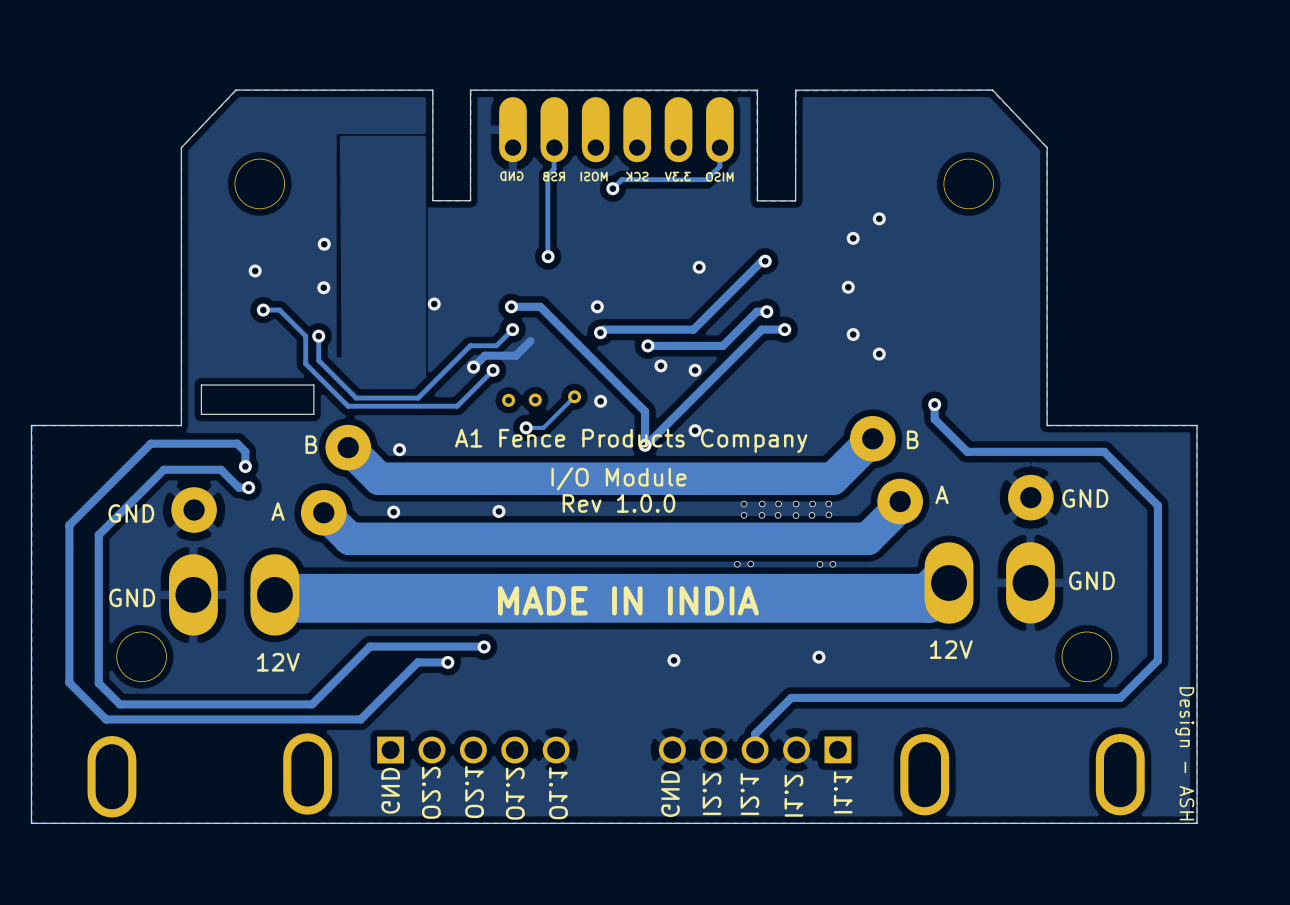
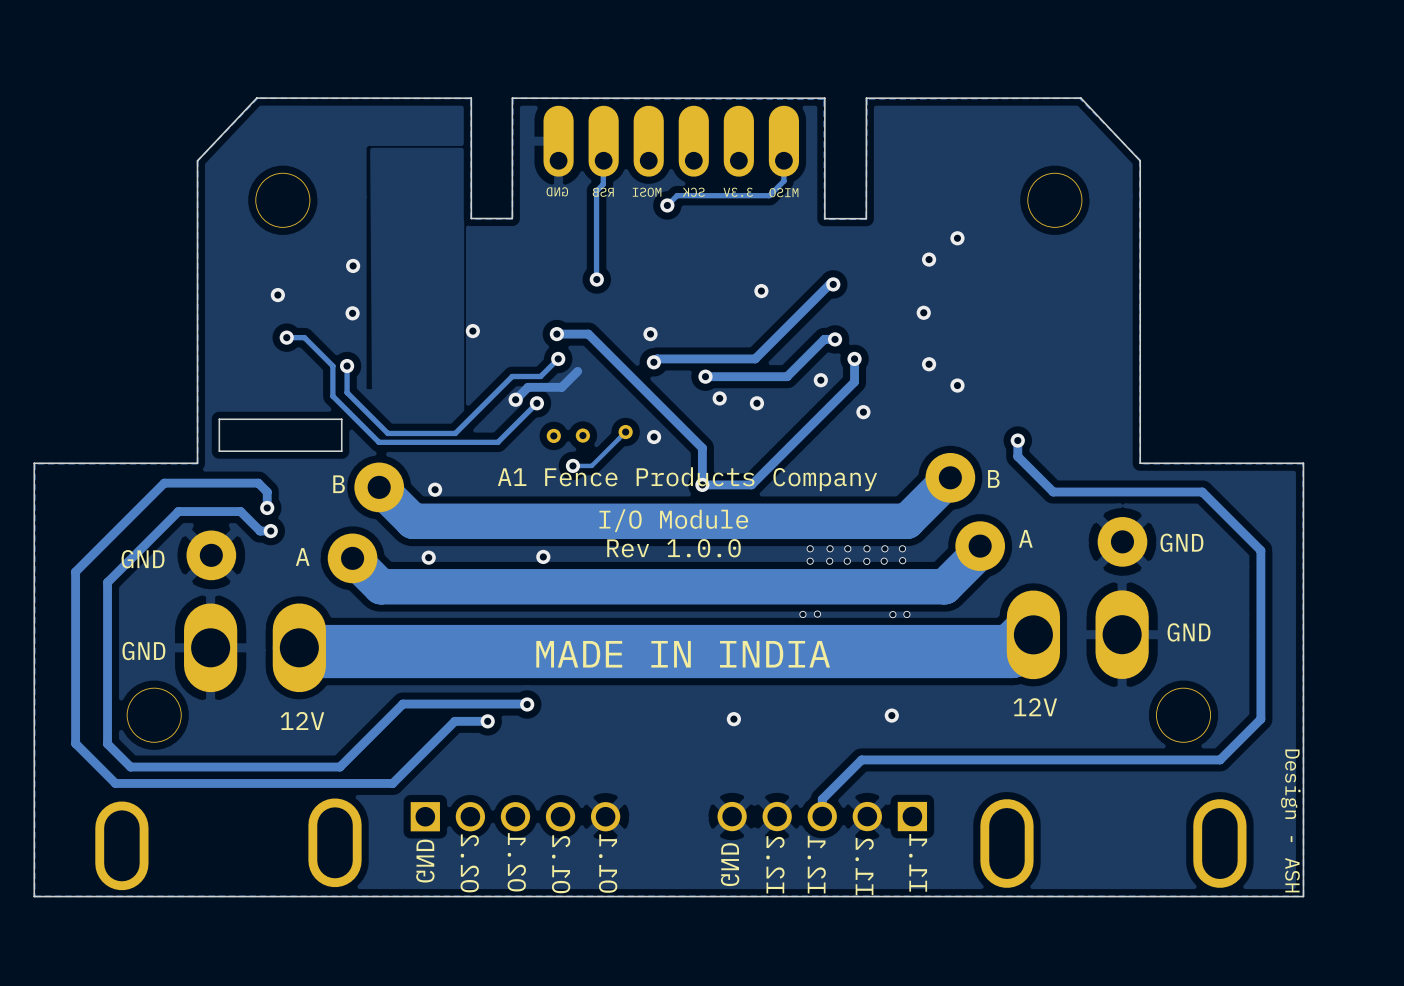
track: (784, 329) (761, 329) (646, 445) -> (854, 358) (854, 382) (751, 484) (703, 484)
via: none -> (820, 380)
via: none -> (863, 412)
via: (695, 430) -> none

